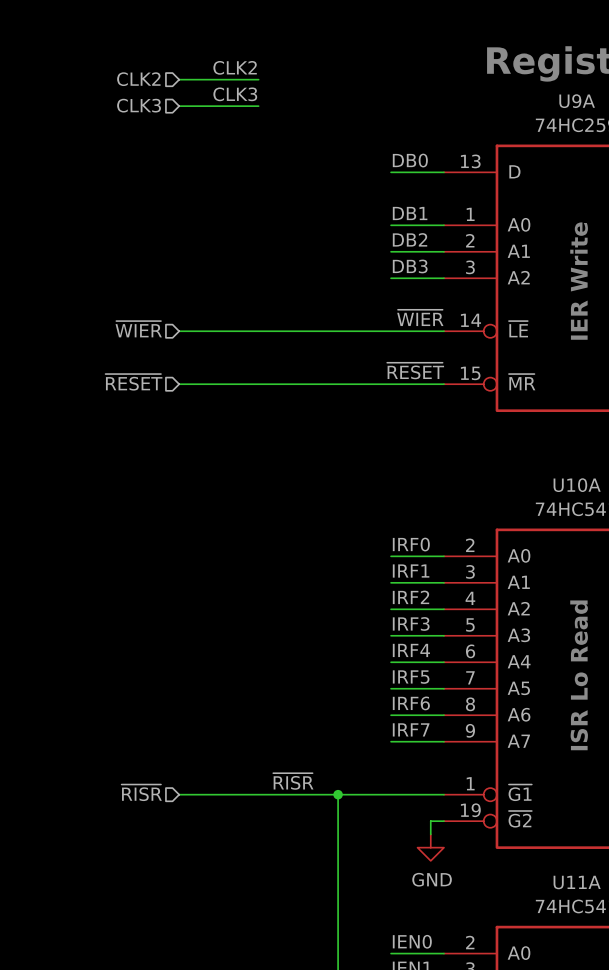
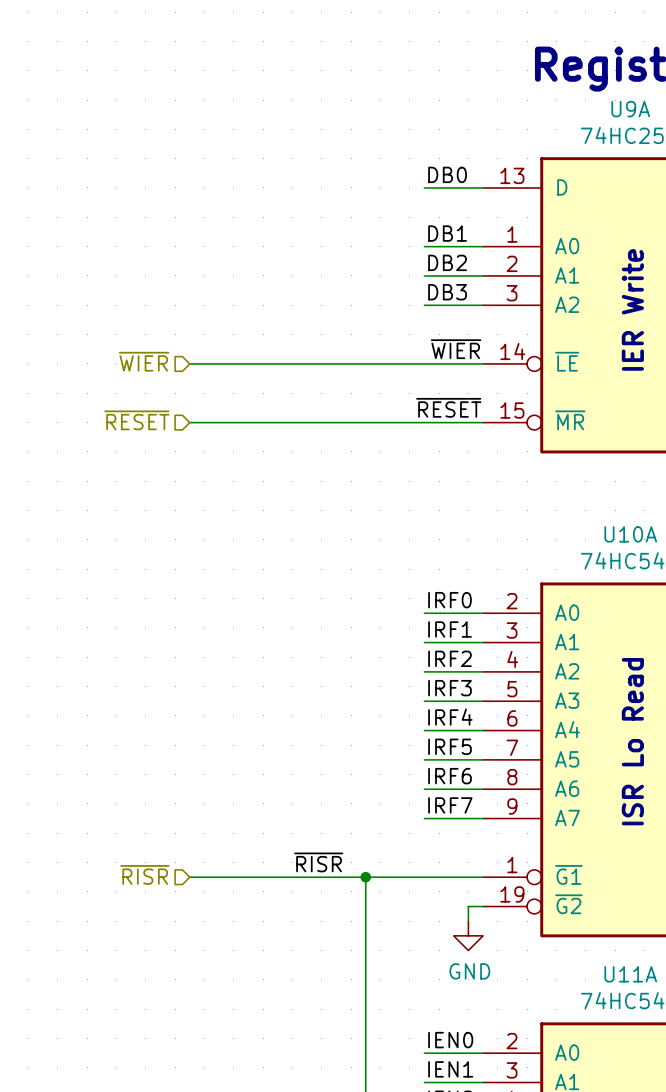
label: CLK2 (235, 67) -> none
hierarchical label: CLK2 (138, 79) -> none
wire: (179, 79) (258, 79) -> none
label: CLK3 (235, 94) -> none
hierarchical label: CLK3 (139, 105) -> none
wire: (179, 106) (258, 106) -> none

